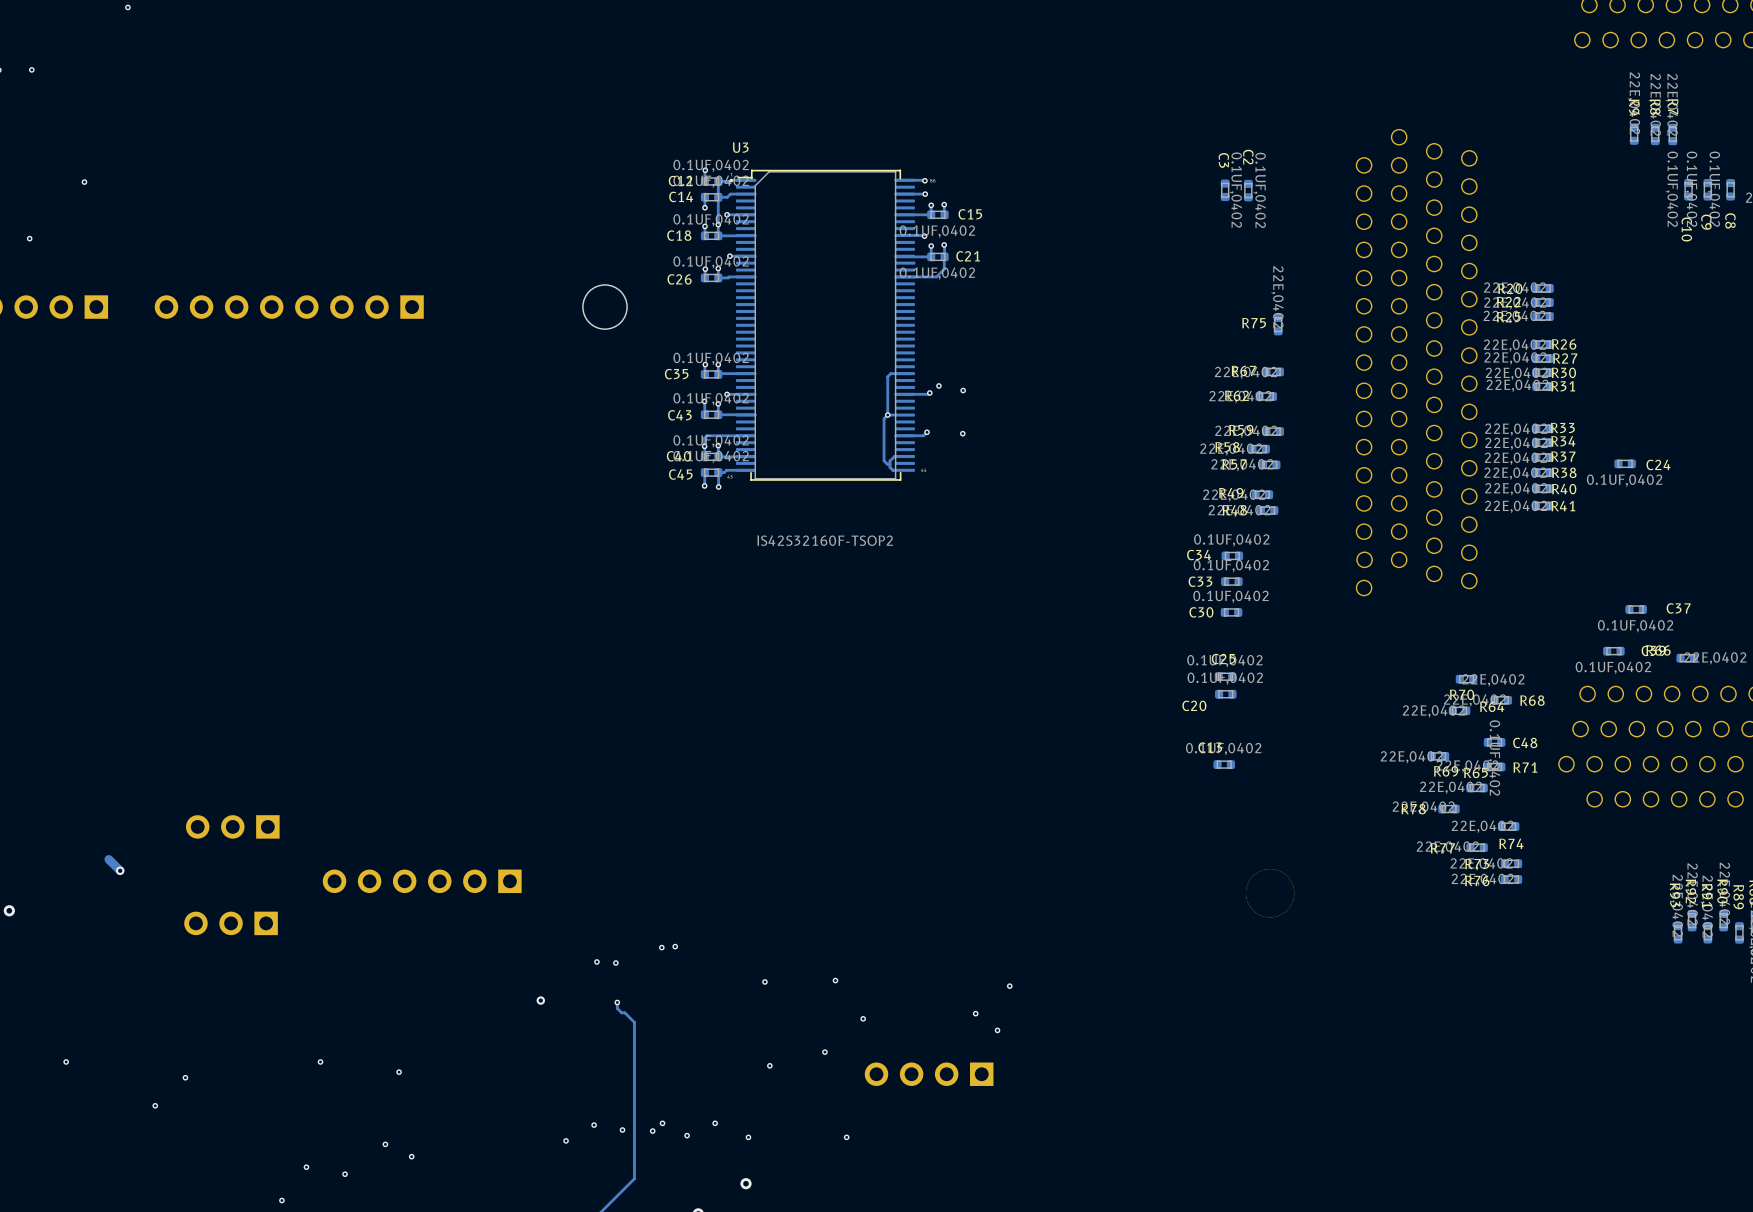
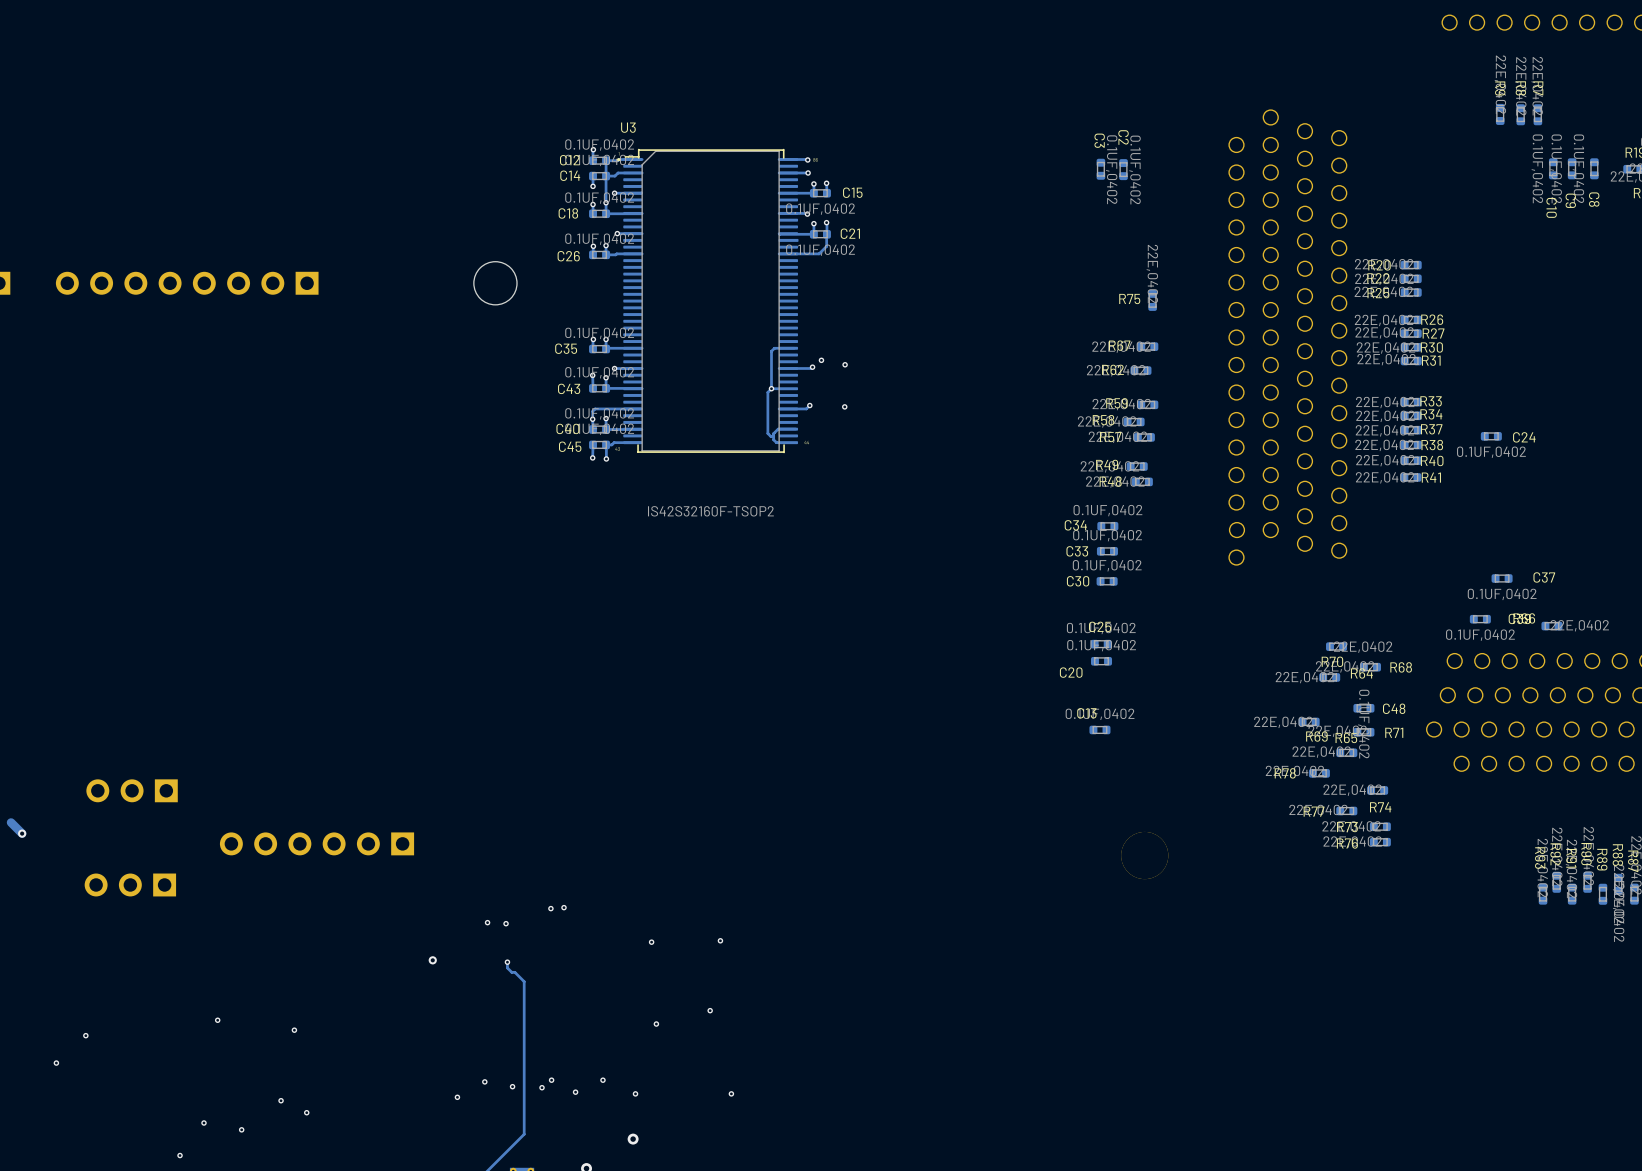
via: (1009, 986) -> none
via: (975, 1013) -> none
via: (863, 1018) -> none
via: (997, 1030) -> none
part: (929, 1074) -> none

